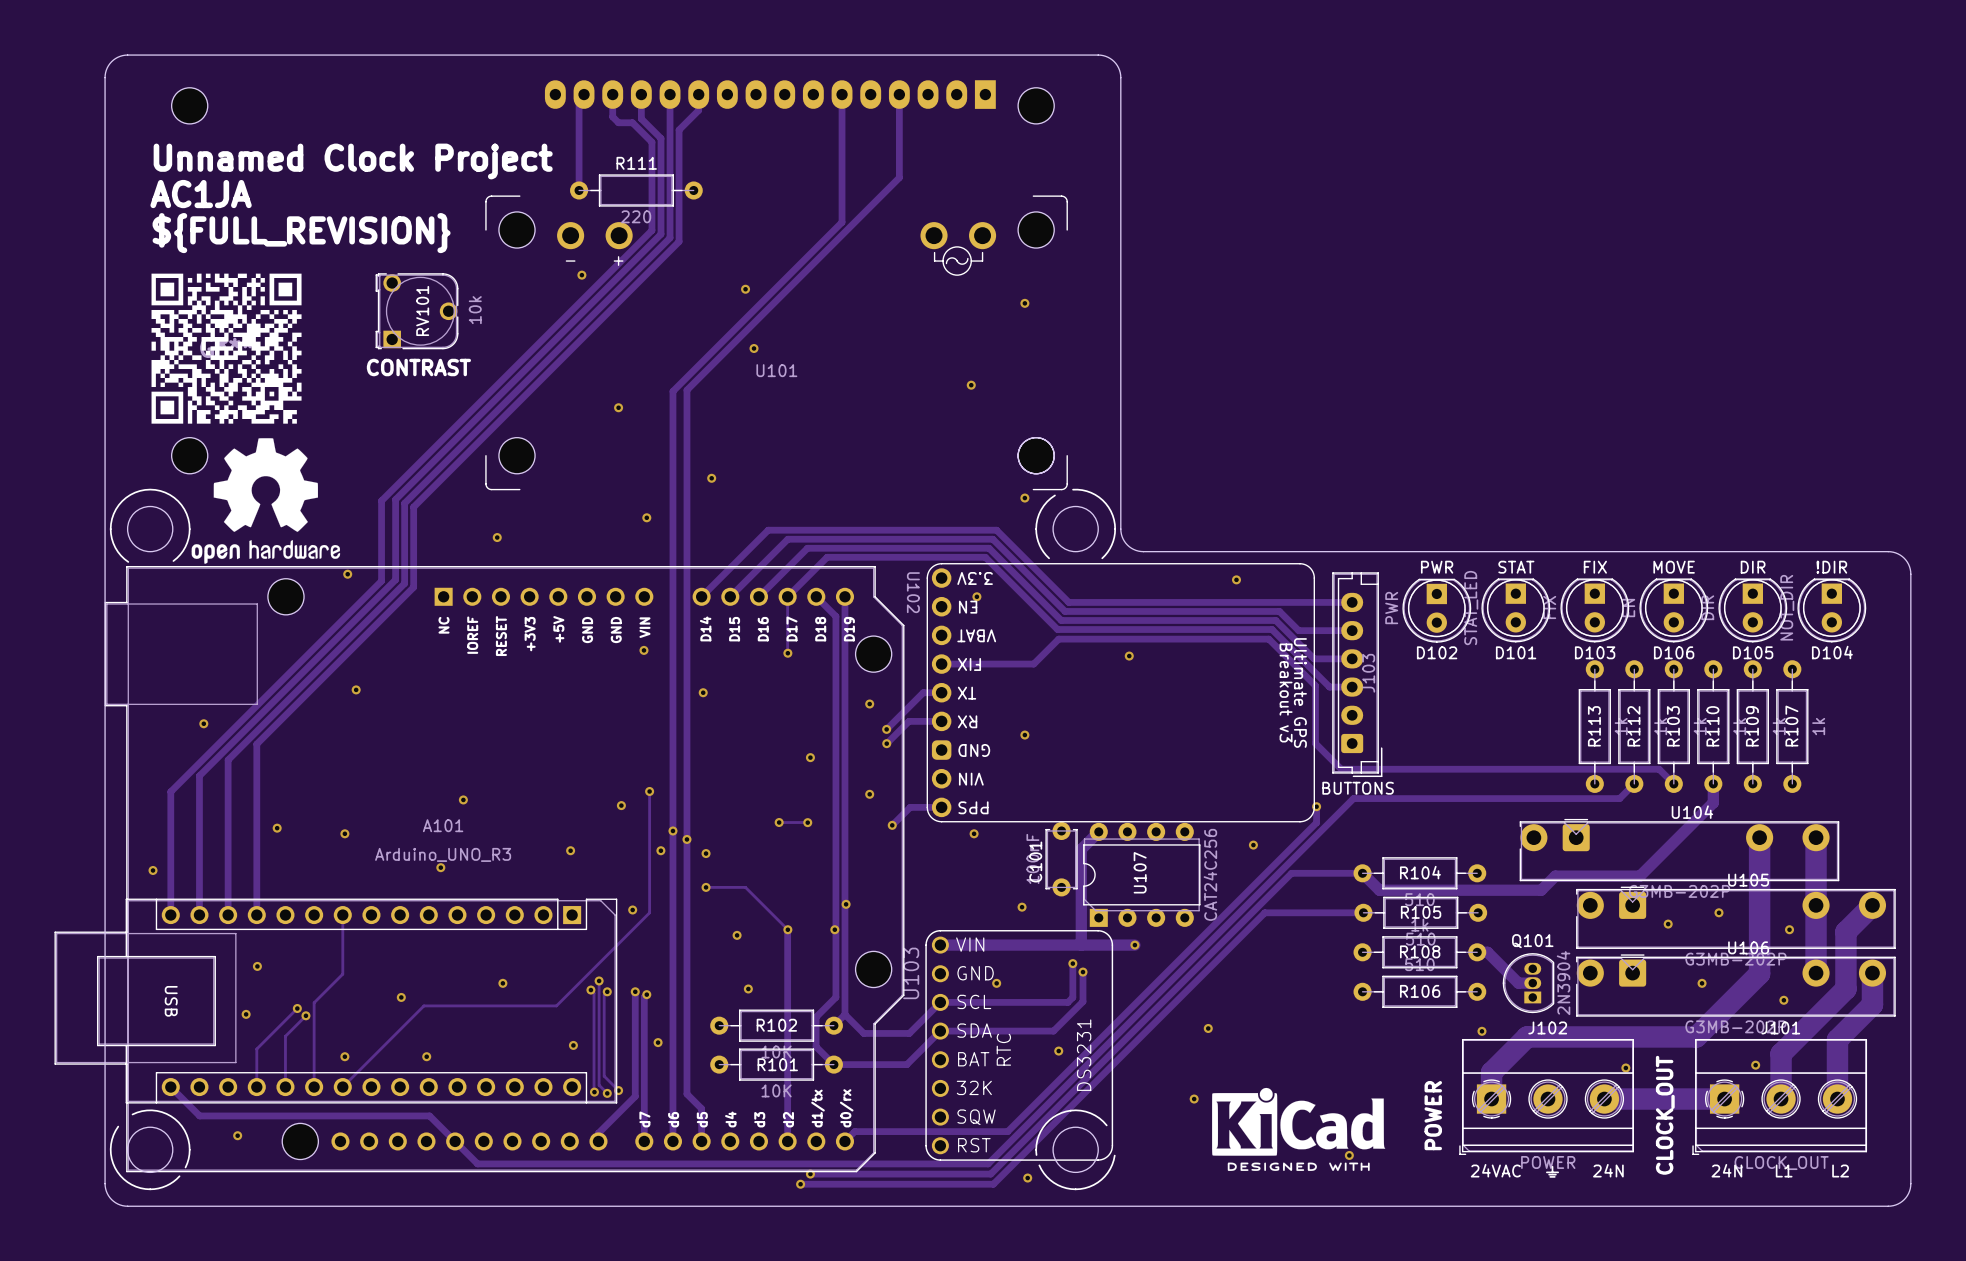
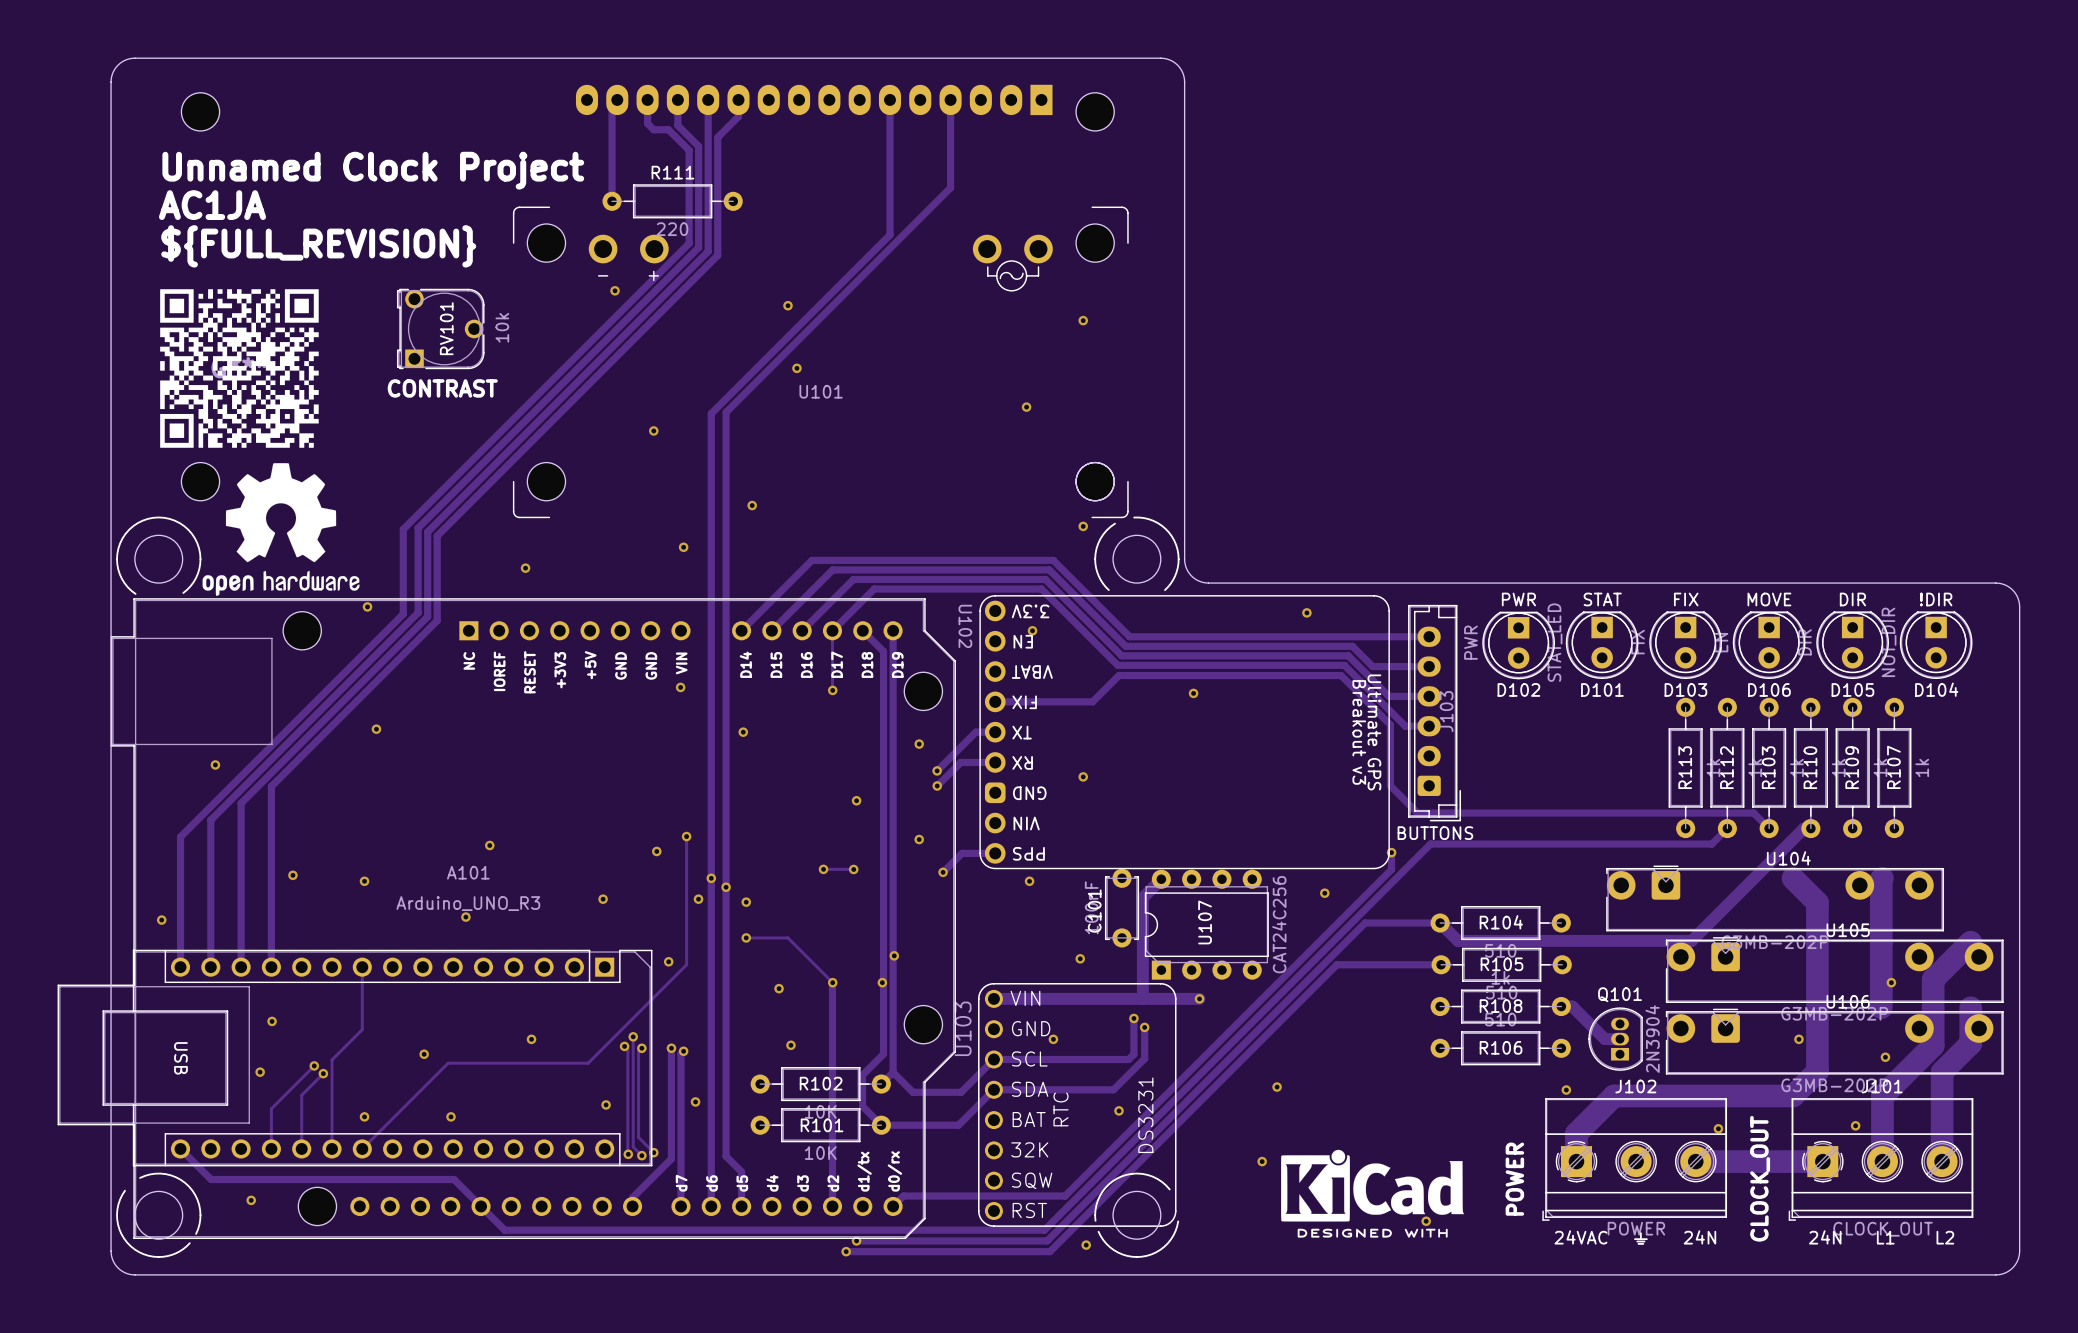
track: (1713, 783) (1713, 802) (1639, 876) (1555, 876) (1541, 890) -> (1810, 828) (1803, 828) (1691, 940) (1628, 940)
track: none -> (1882, 878) (1881, 1007)
track: (1759, 837) (1759, 973) (1719, 1013) -> (1792, 878) (1817, 902) (1817, 1071)
track: (1816, 837) (1816, 973) -> none
track: (1872, 905) (1845, 931) (1845, 988) (1781, 1053) -> (1970, 942) (1933, 979) (1933, 1045) (1882, 1096) (1882, 1113)
via: (1718, 912) -> none
via: (1668, 924) -> none
track: (1872, 973) (1872, 1004) (1837, 1039) -> (1970, 1007) (1970, 1043) (1942, 1072) (1942, 1098)

